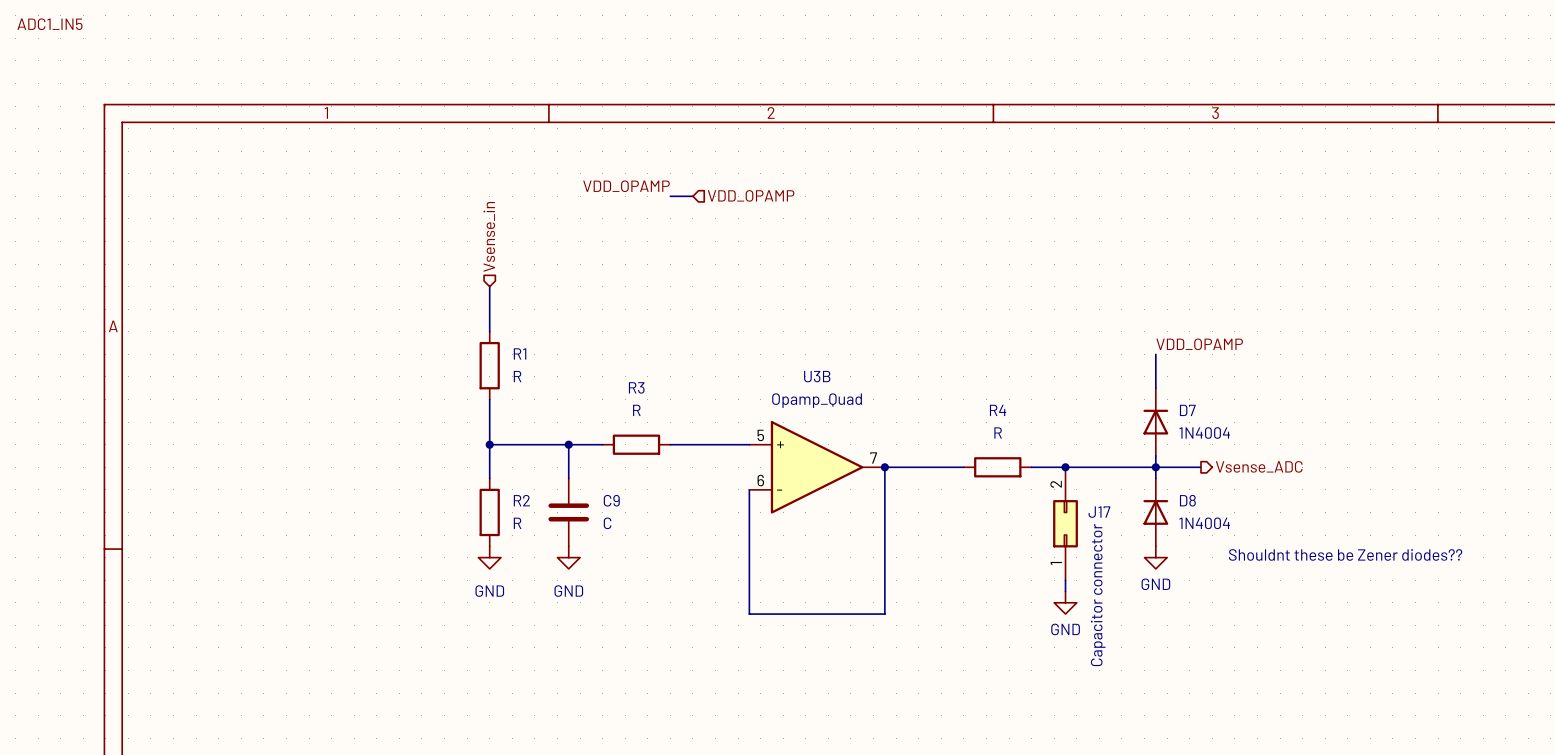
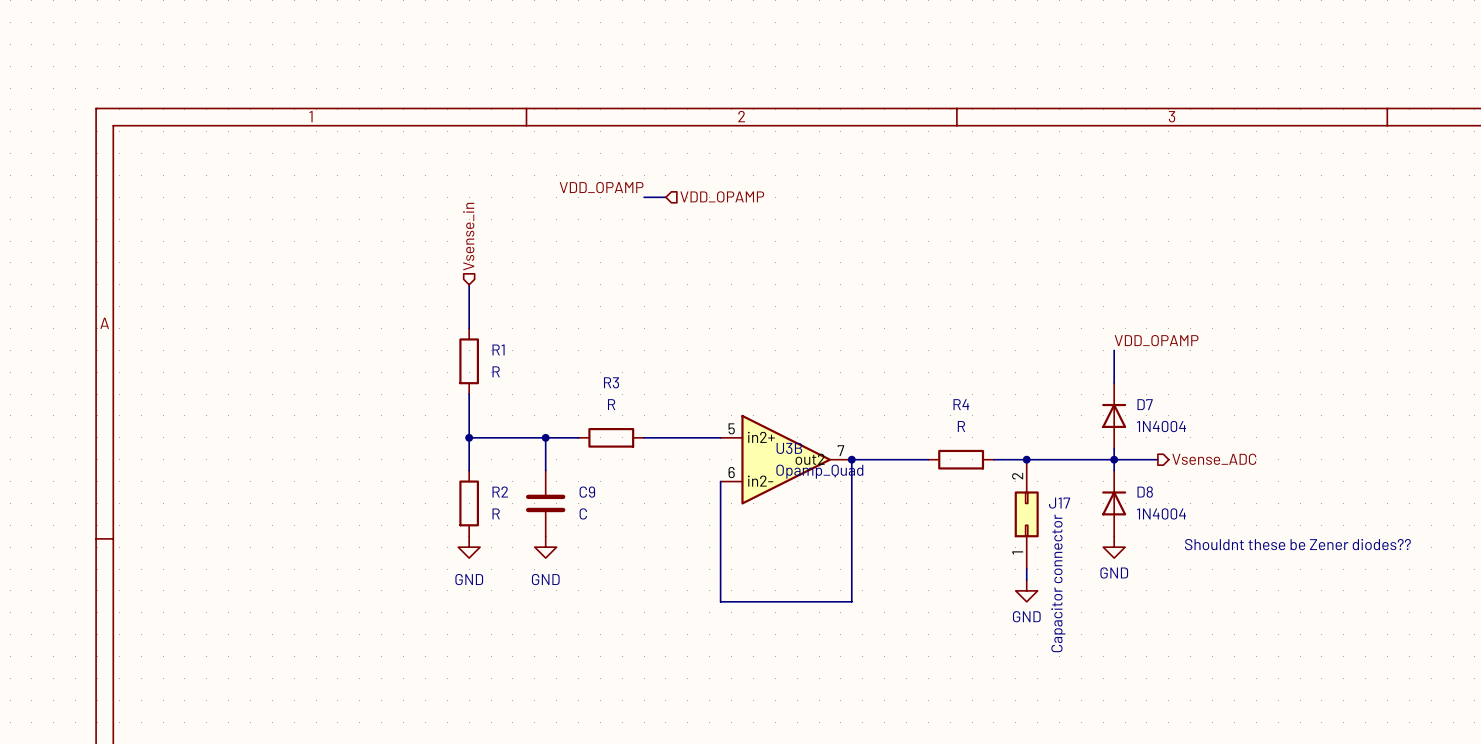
label: ADC1_IN5 (49, 24) -> none
U3B name position: U3B (817, 376) -> U3B (789, 448)
U3B value position: Opamp_Quad (817, 400) -> Opamp_Quad (819, 471)
U3B pin name: + (780, 444) -> in2+ (761, 437)
U3B pin name: none -> out2 (810, 459)
U3B pin name: - (779, 490) -> in2- (760, 481)

